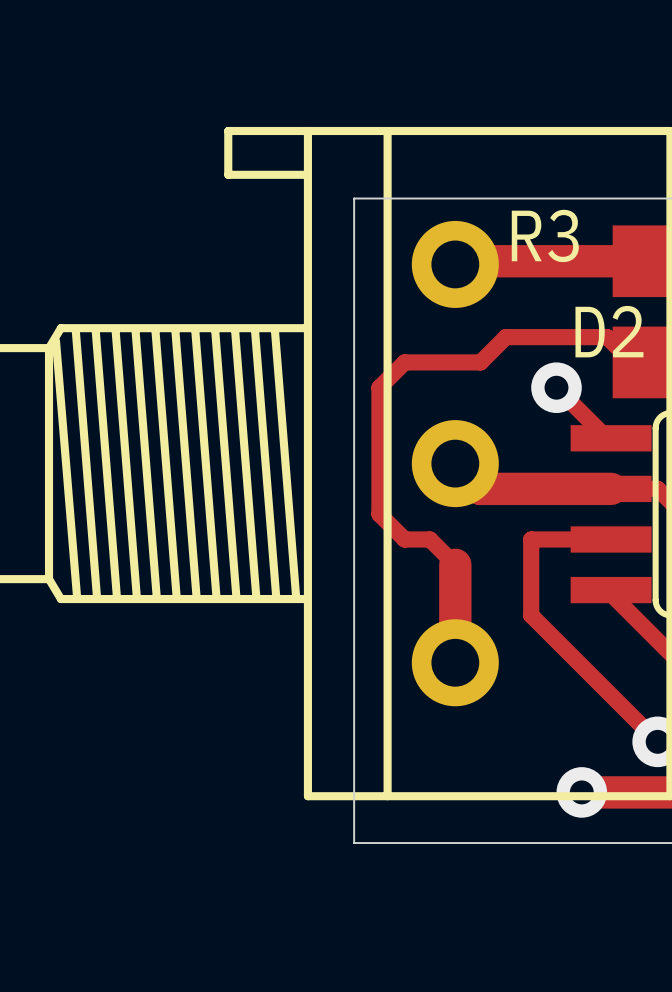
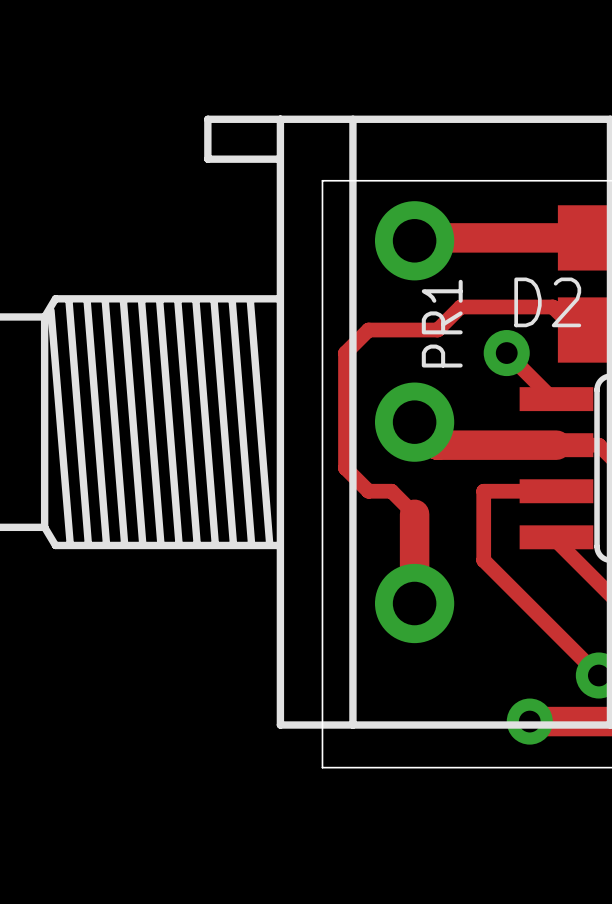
R3 name: R3 (545, 235) -> PR1 (442, 323)

